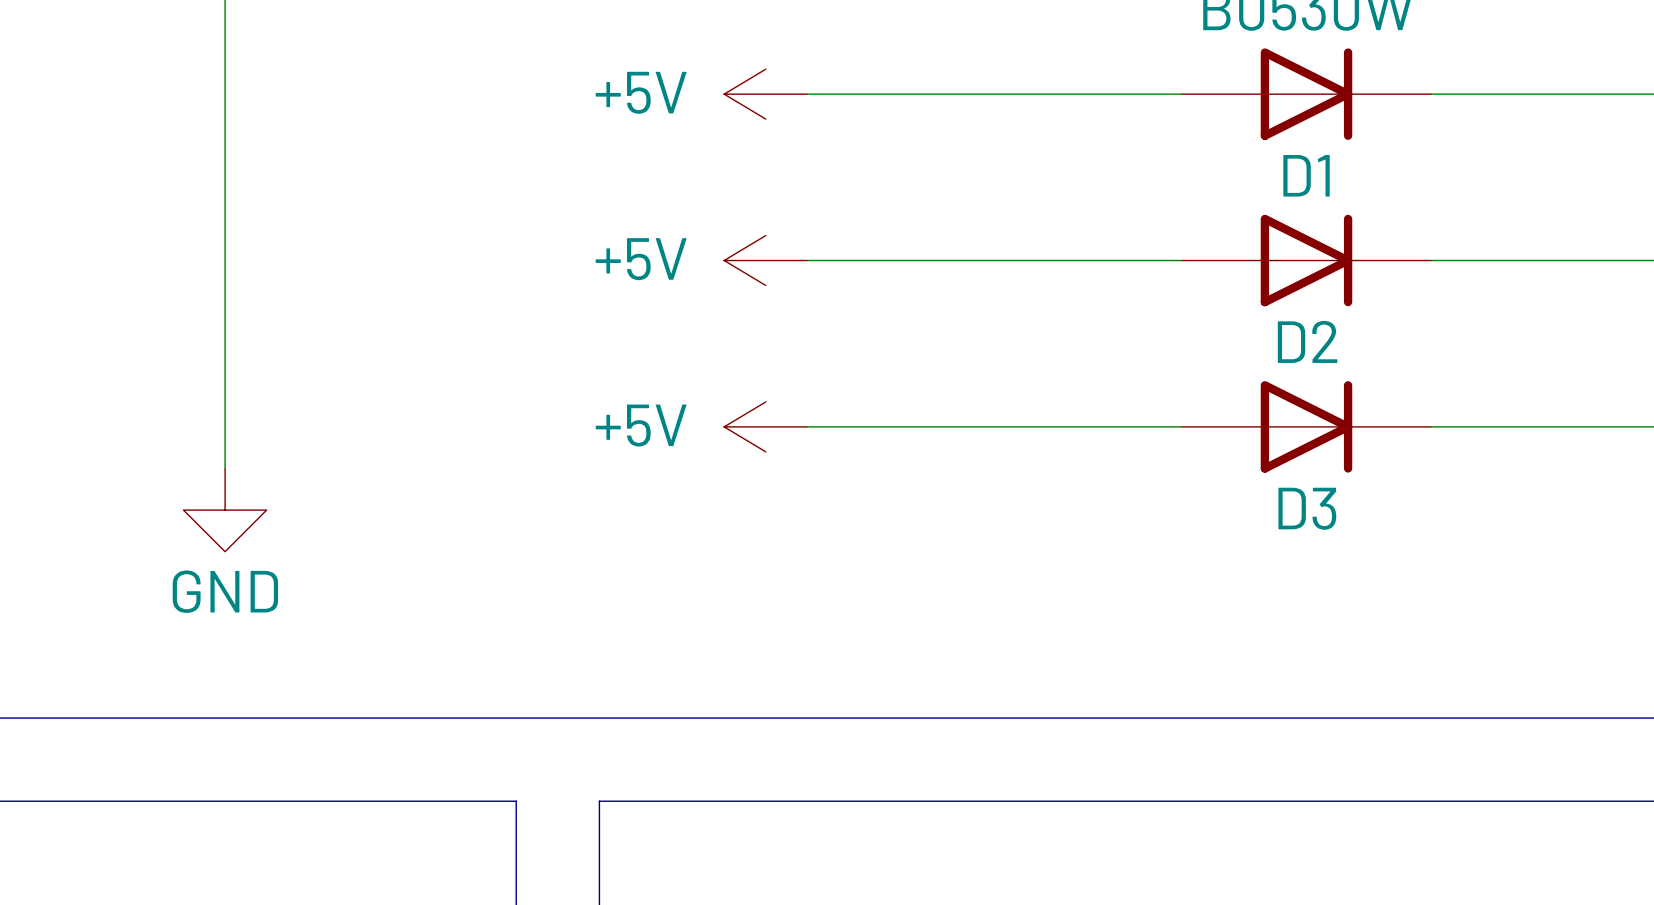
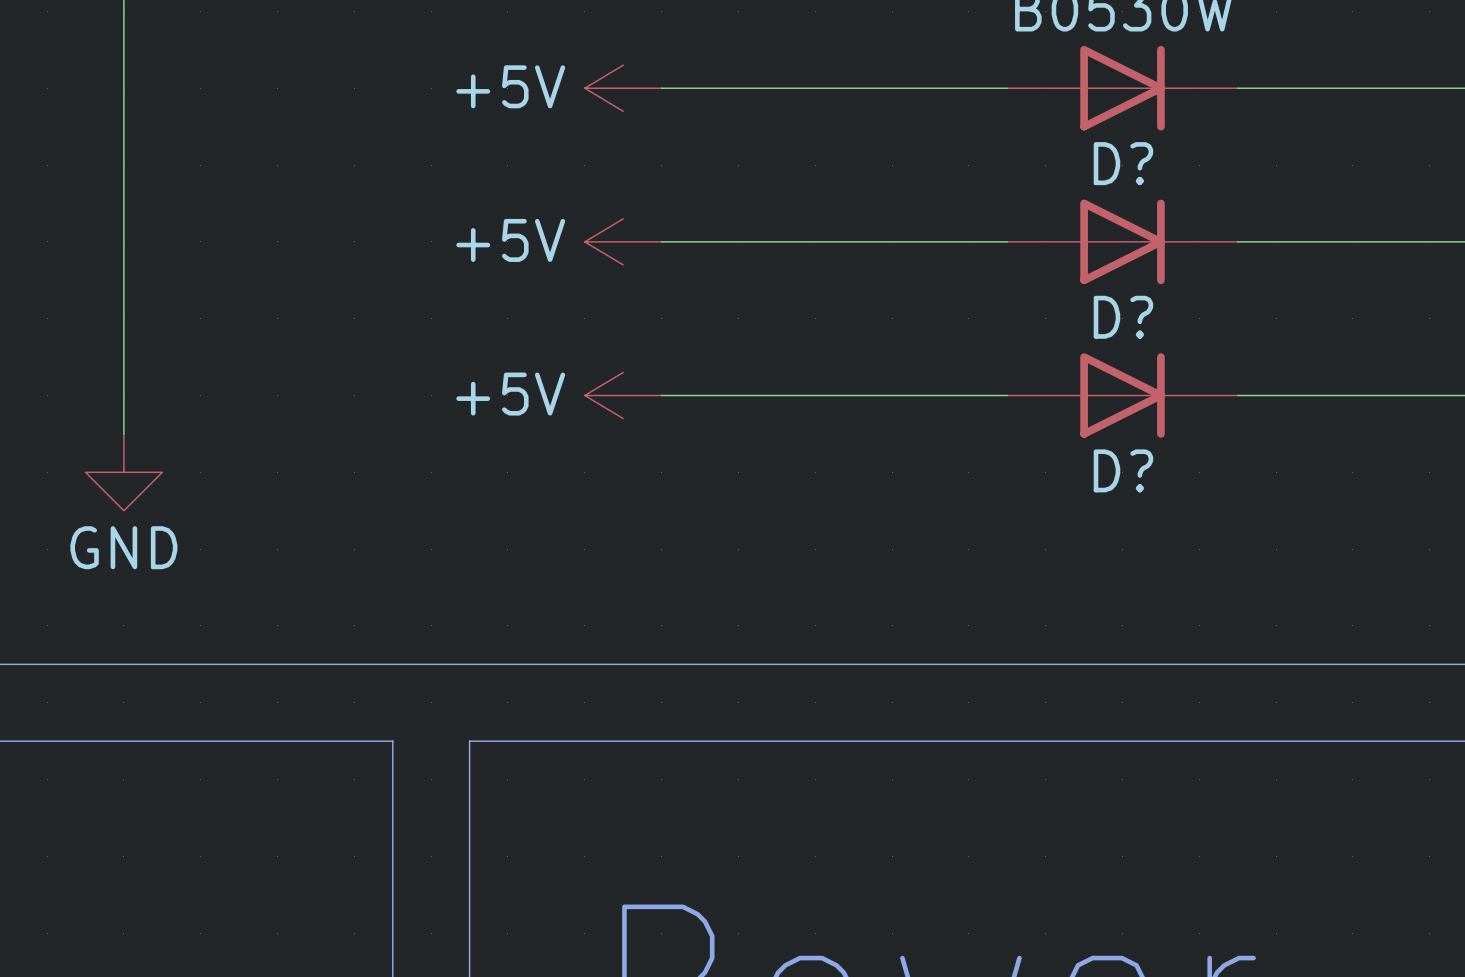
D1 name: D1 (1306, 175) -> D? (1123, 163)
D2 name: D2 (1307, 341) -> D? (1123, 317)
D3 name: D3 (1307, 508) -> D? (1123, 470)

